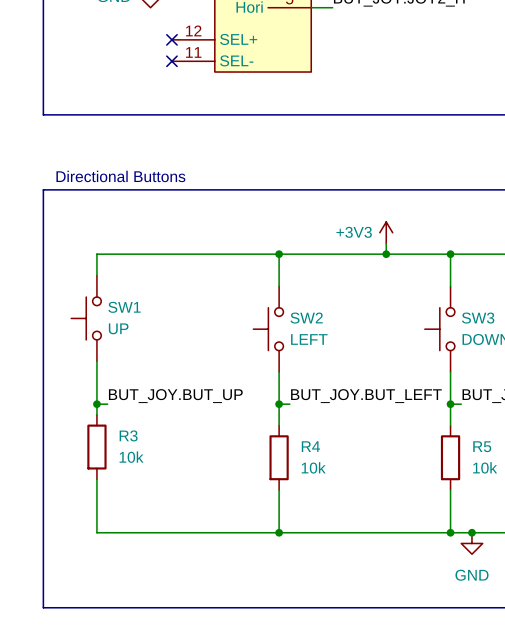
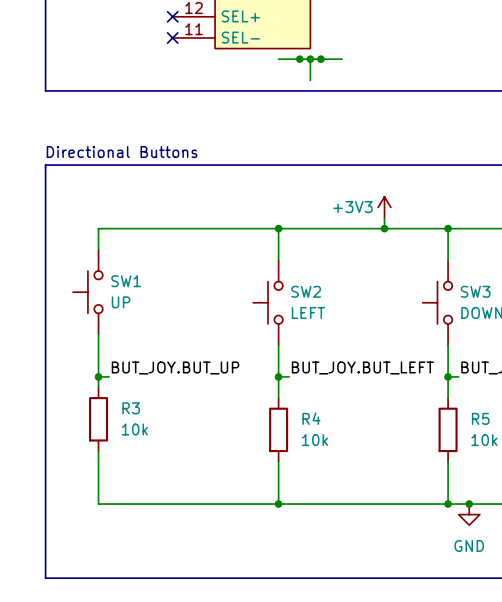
wire: none -> (278, 59) (342, 59)
junction: none -> (299, 59)
wire: none -> (310, 59) (310, 80)
junction: none -> (310, 59)
junction: none -> (320, 59)

